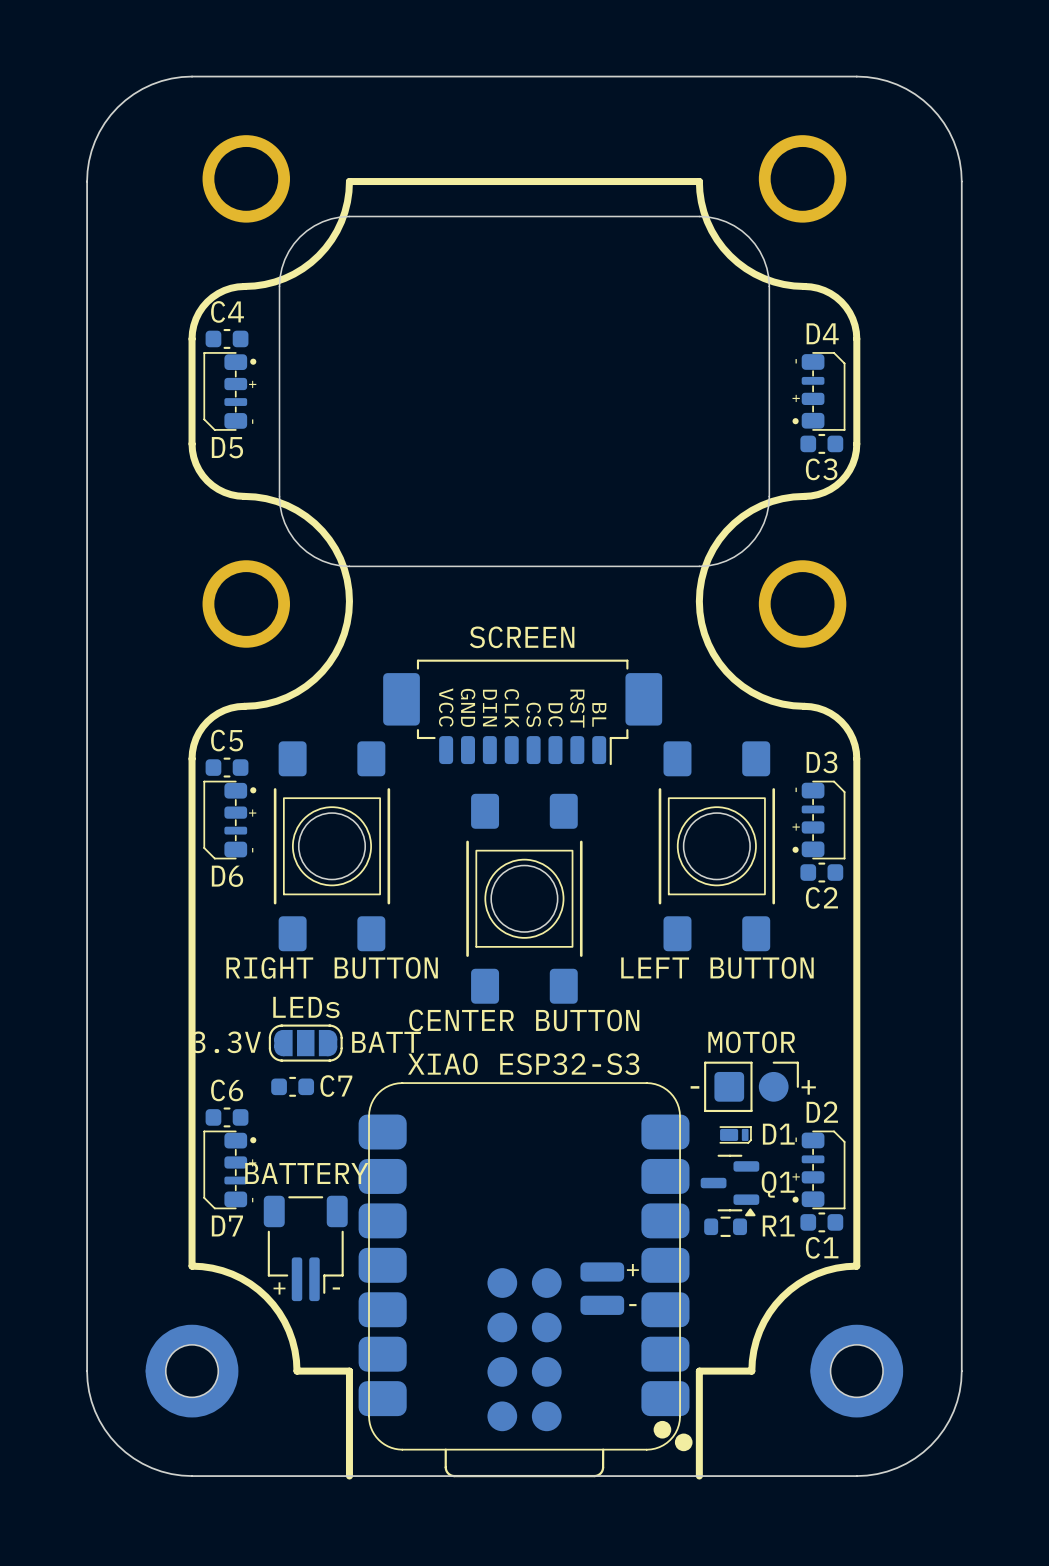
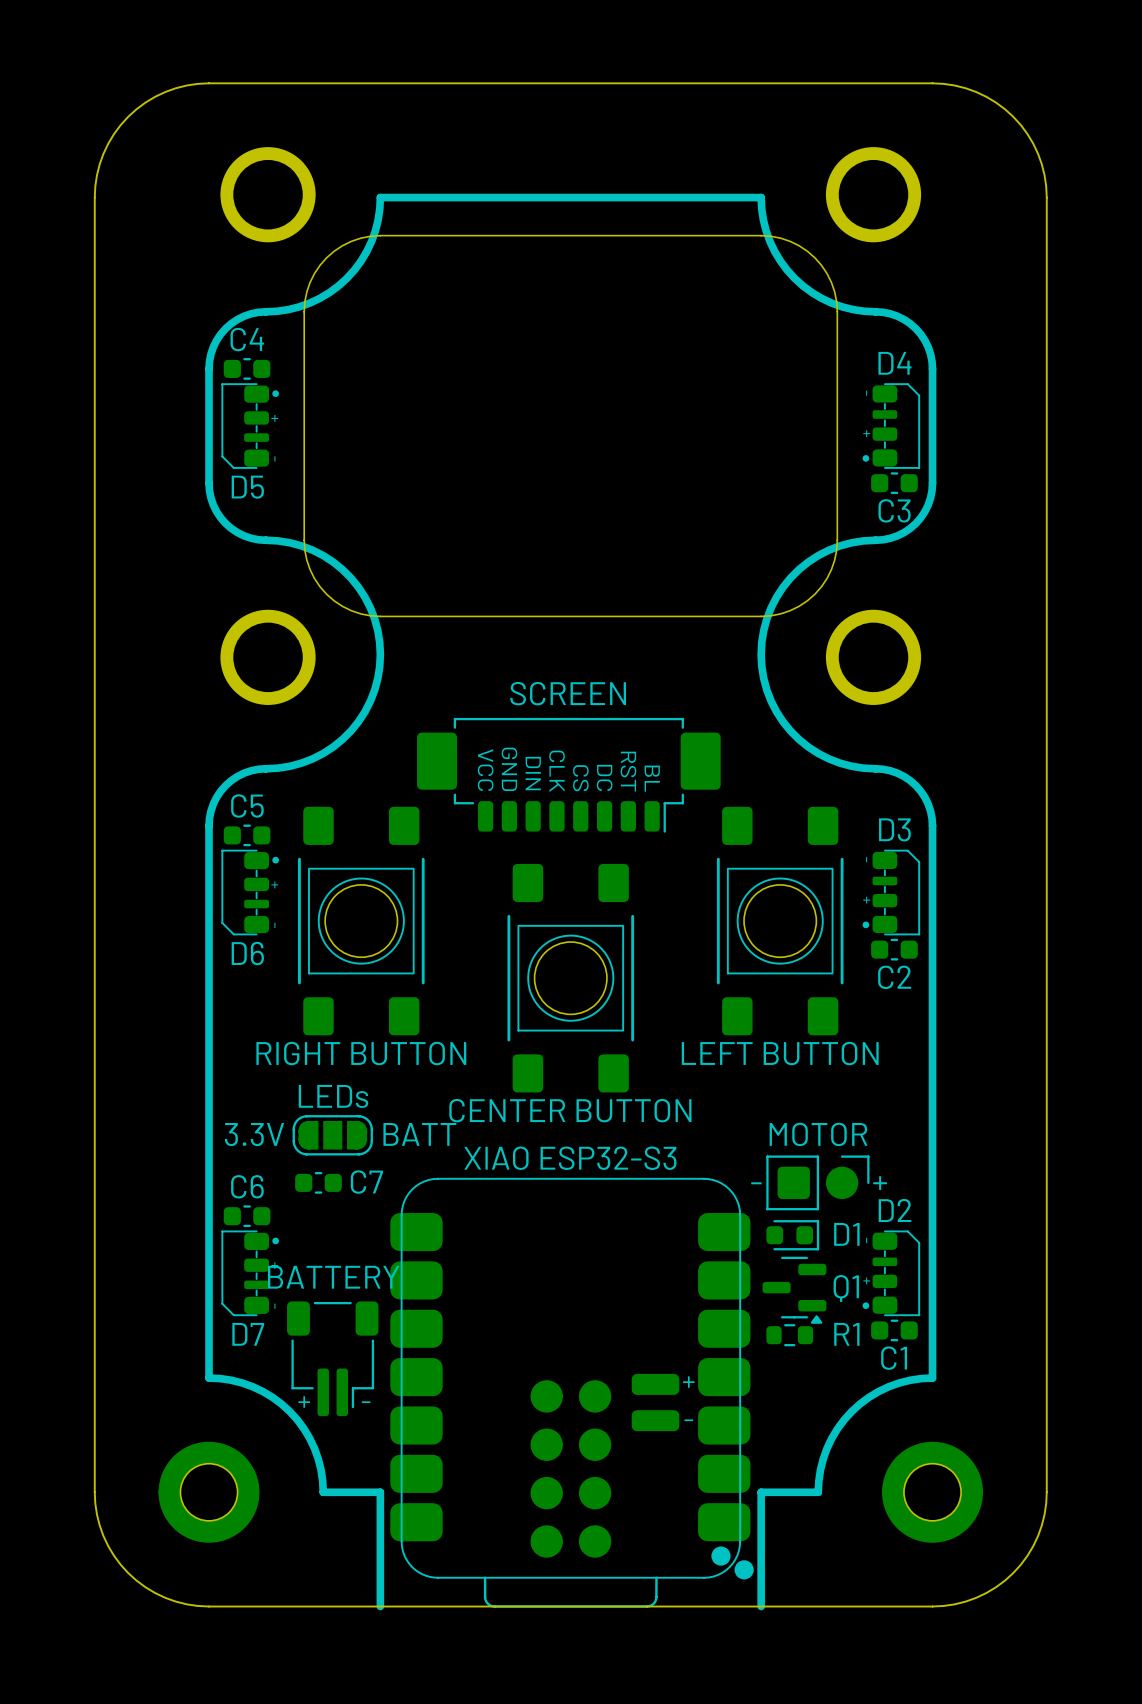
D1 footprint: [719, 1126, 752, 1144] -> [766, 1220, 820, 1251]

